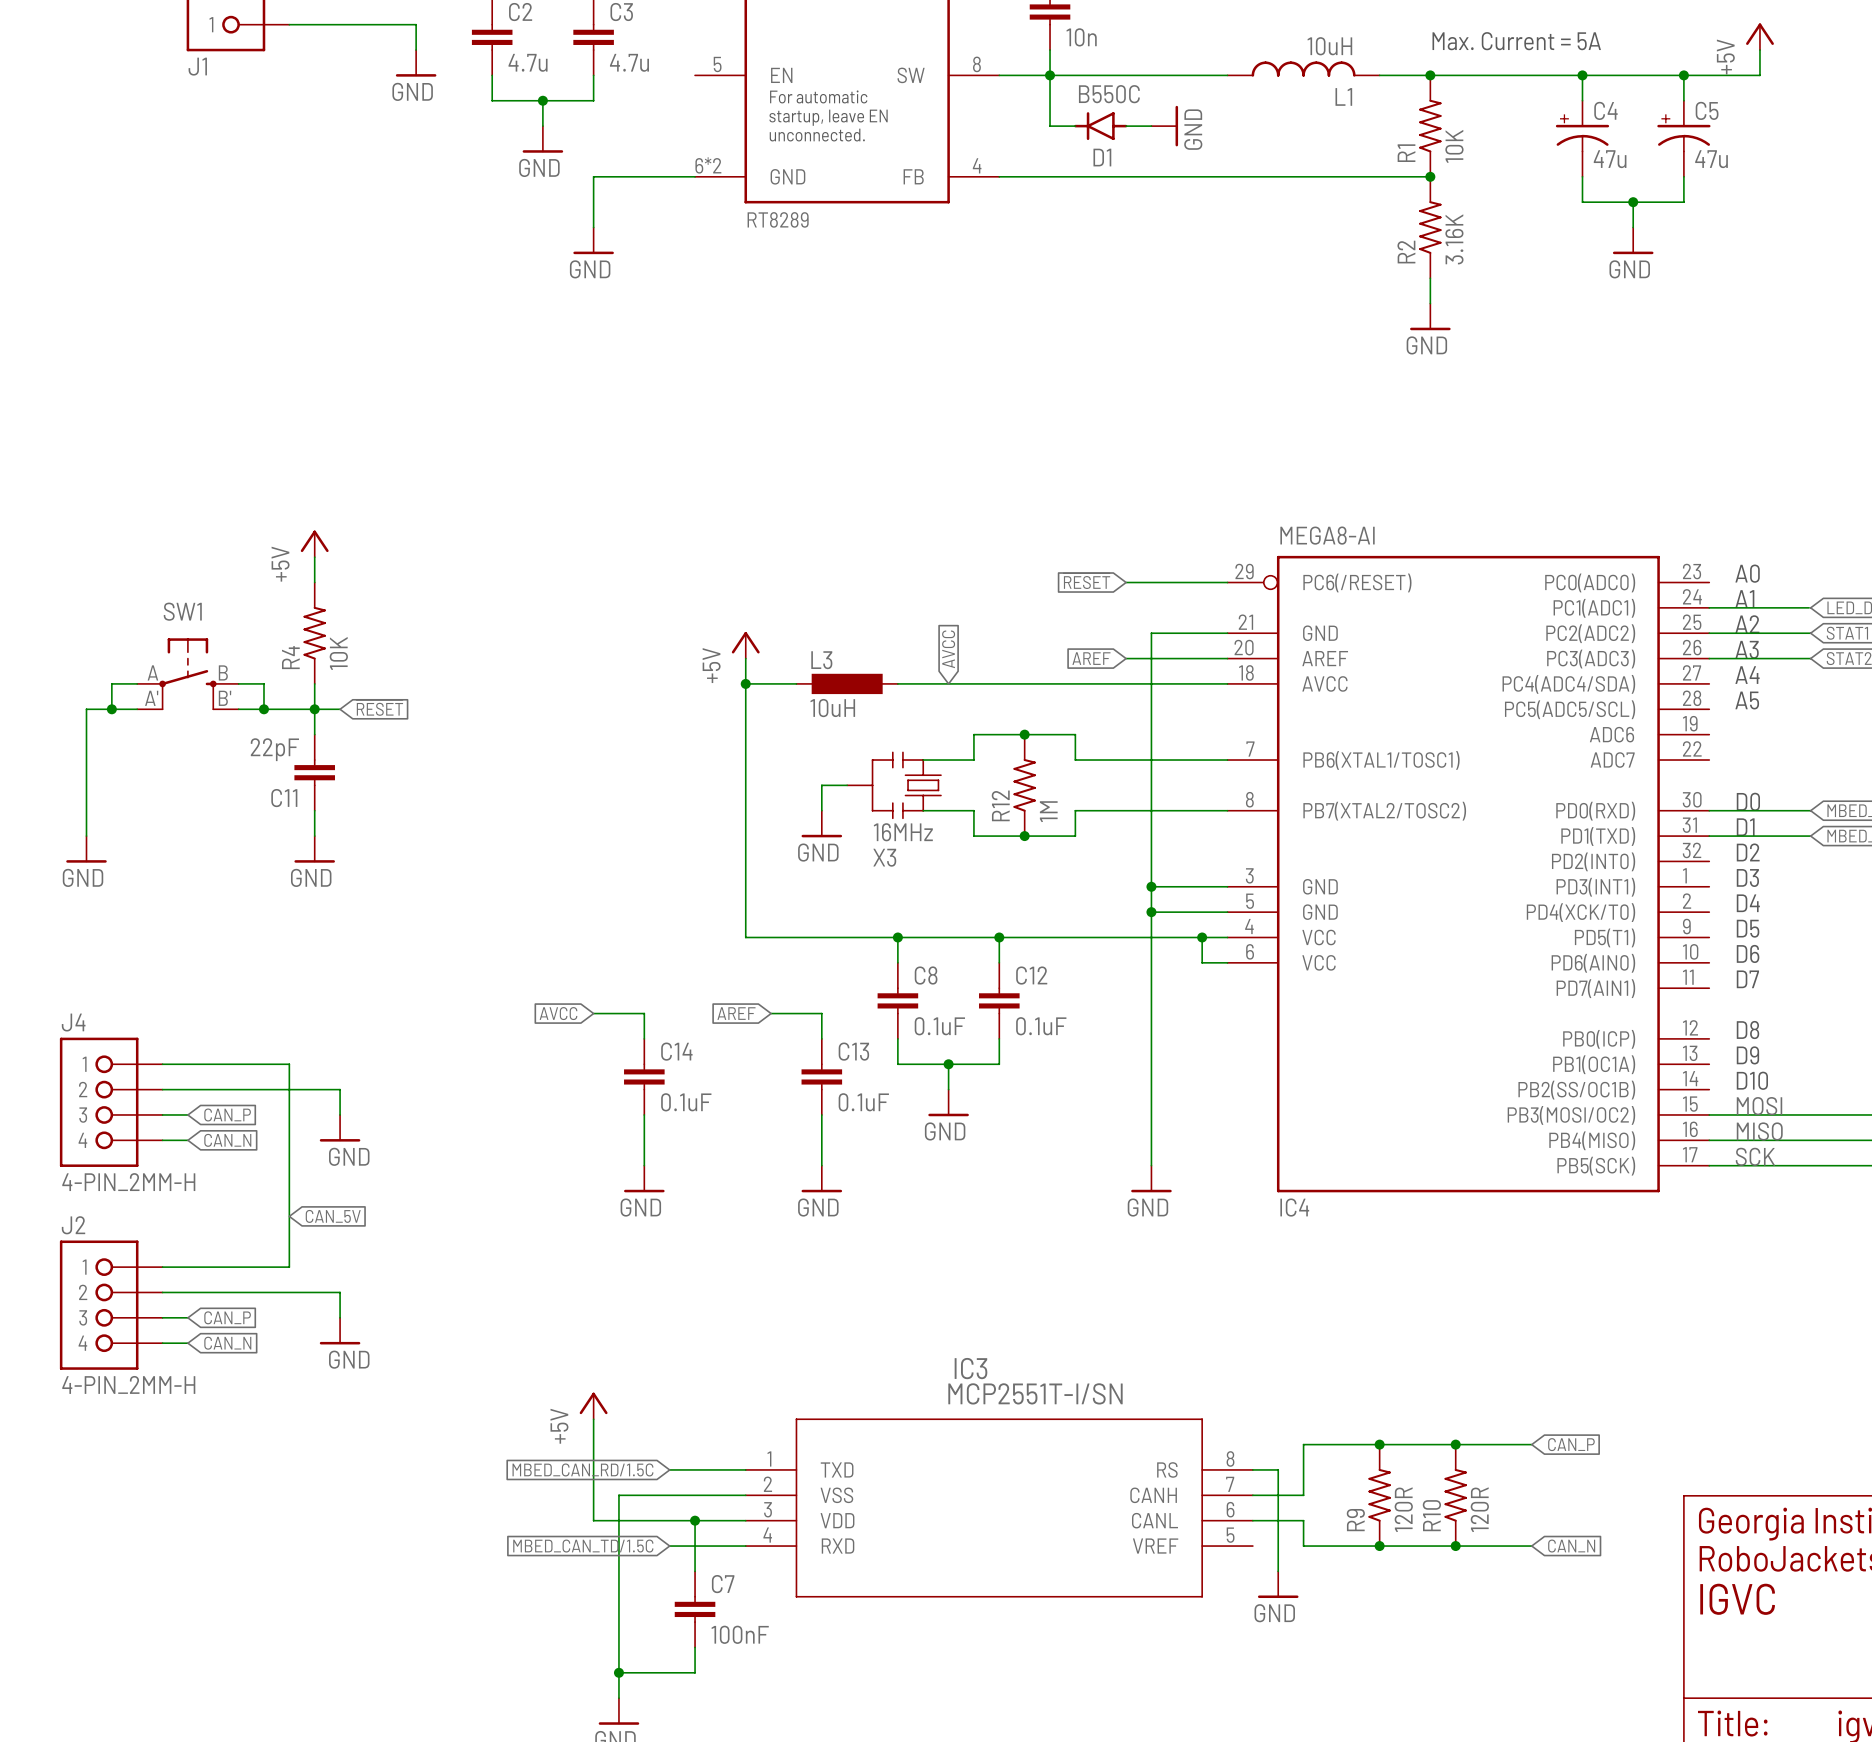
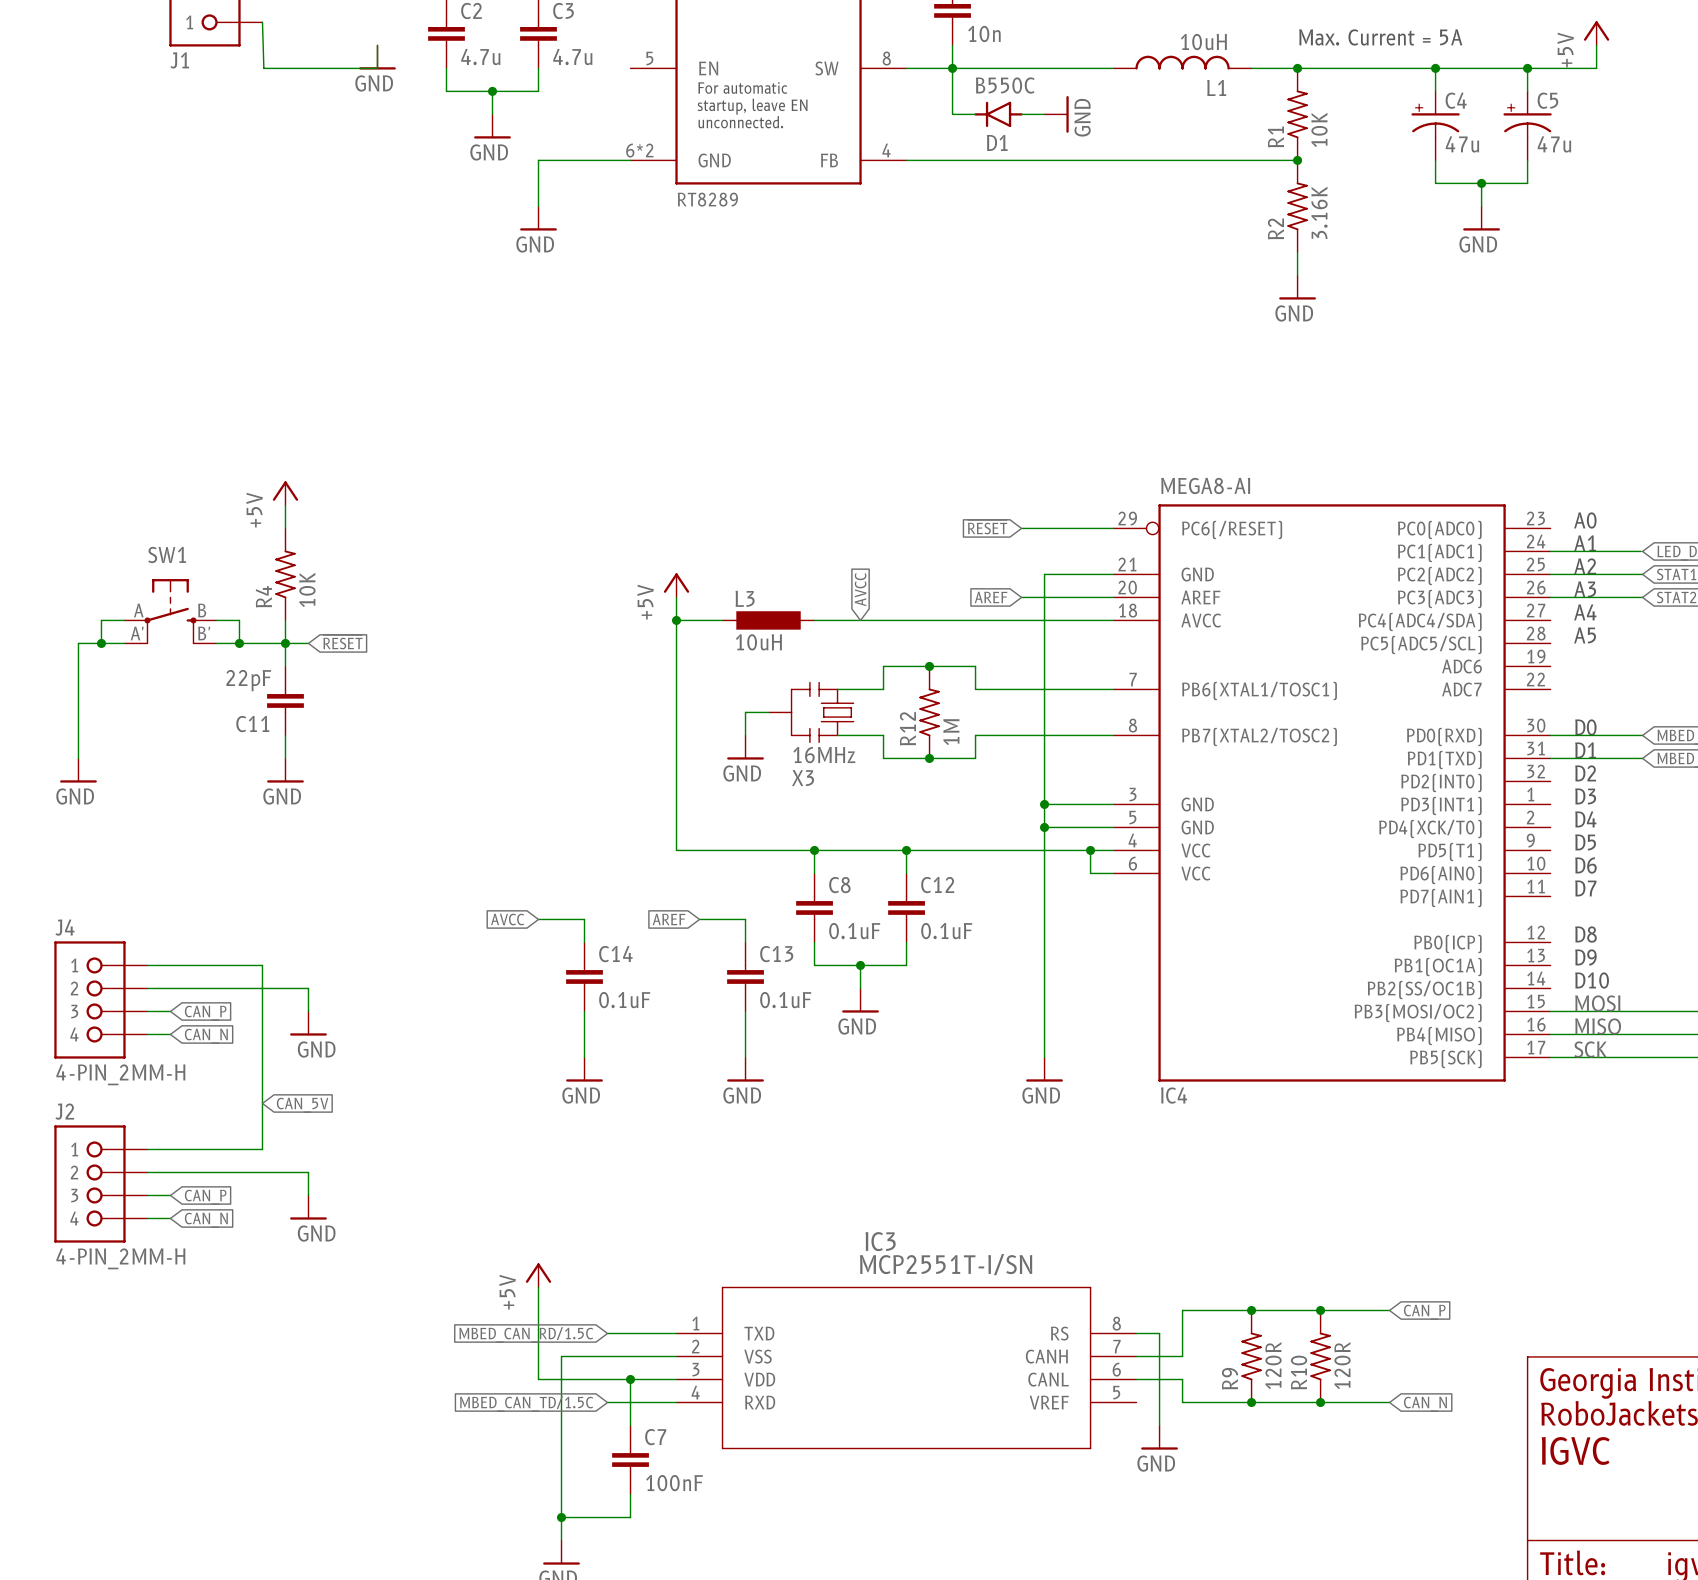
wire: (289, 24) (416, 24) (416, 50) -> (262, 22) (263, 68) (377, 68) (377, 45)

